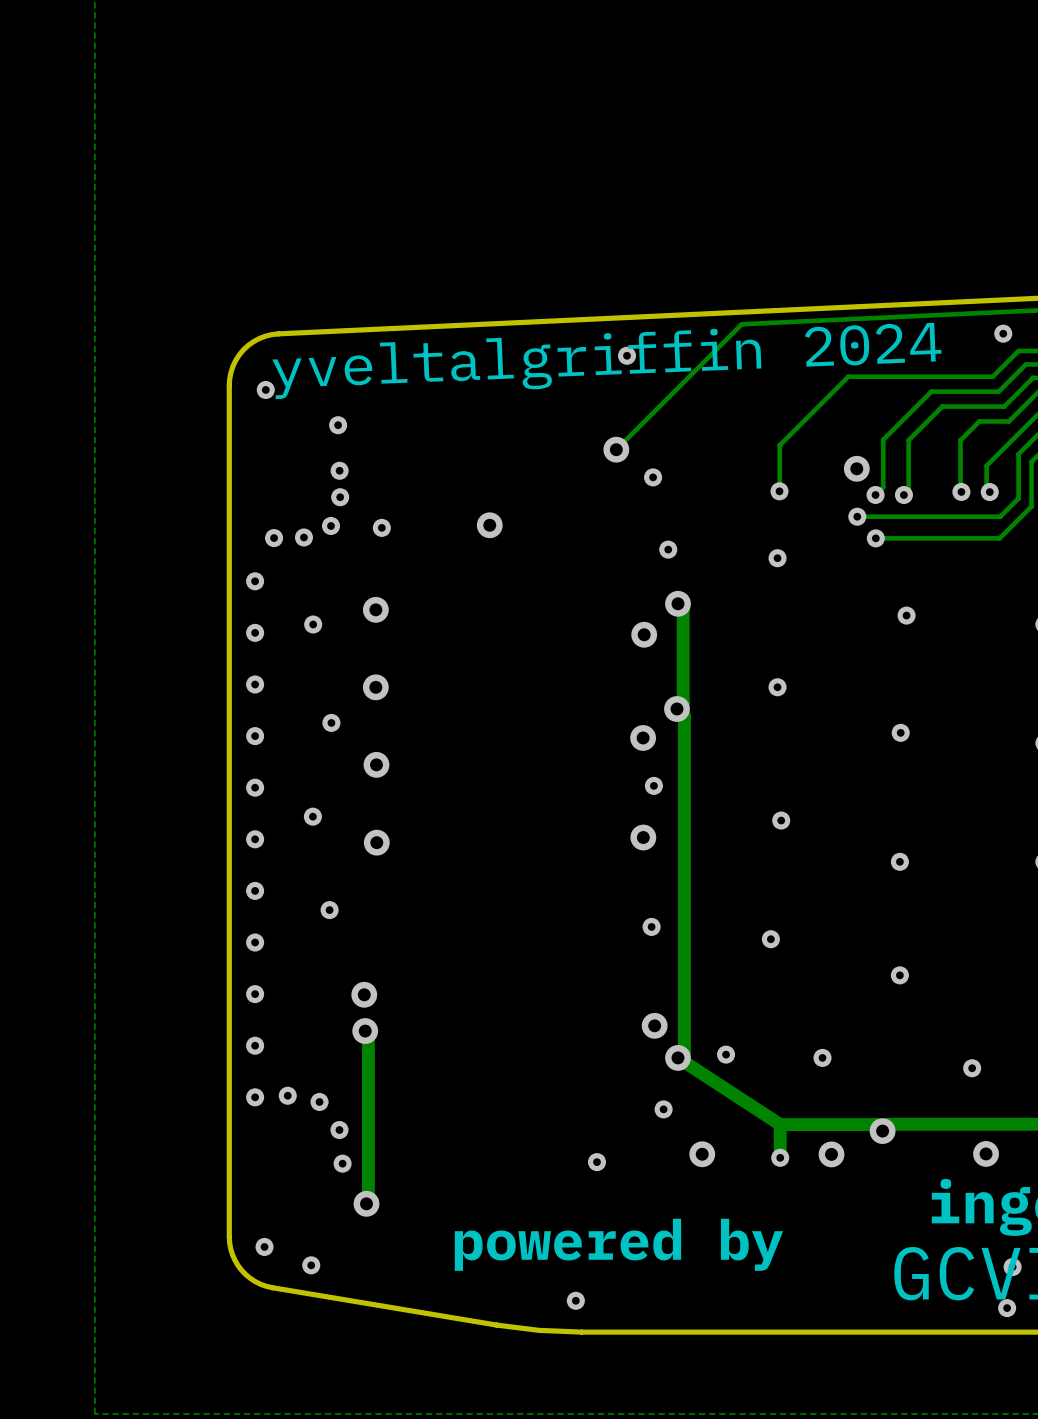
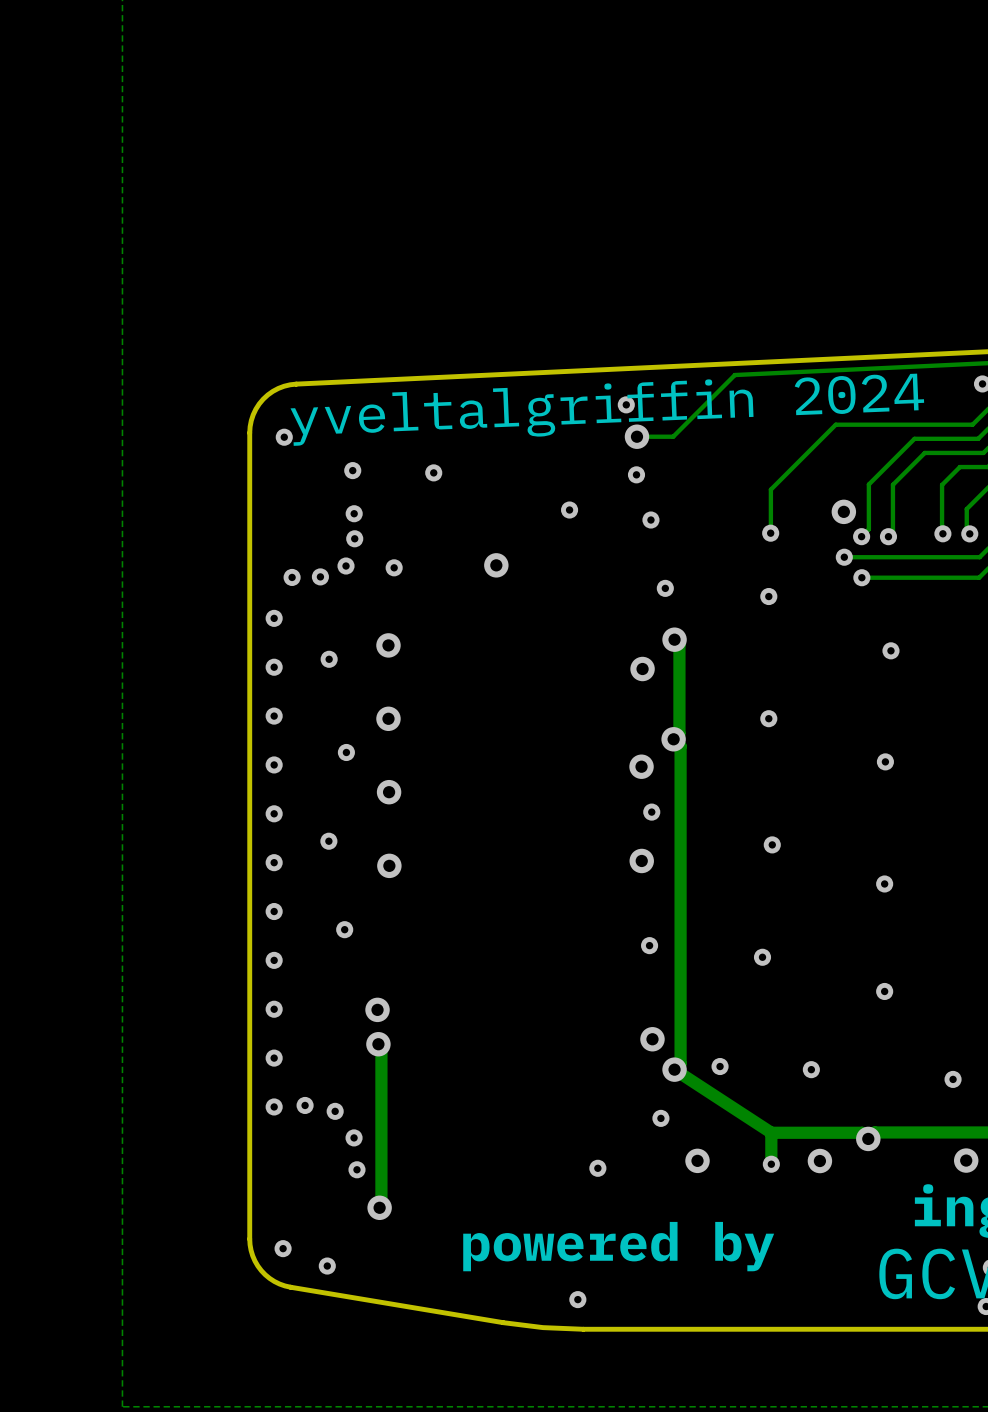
track: (676, 389) (616, 449) -> (673, 436) (636, 436)
via: none -> (433, 472)
via: none -> (636, 474)
via position: (616, 449) -> (636, 436)
via: none -> (569, 510)

